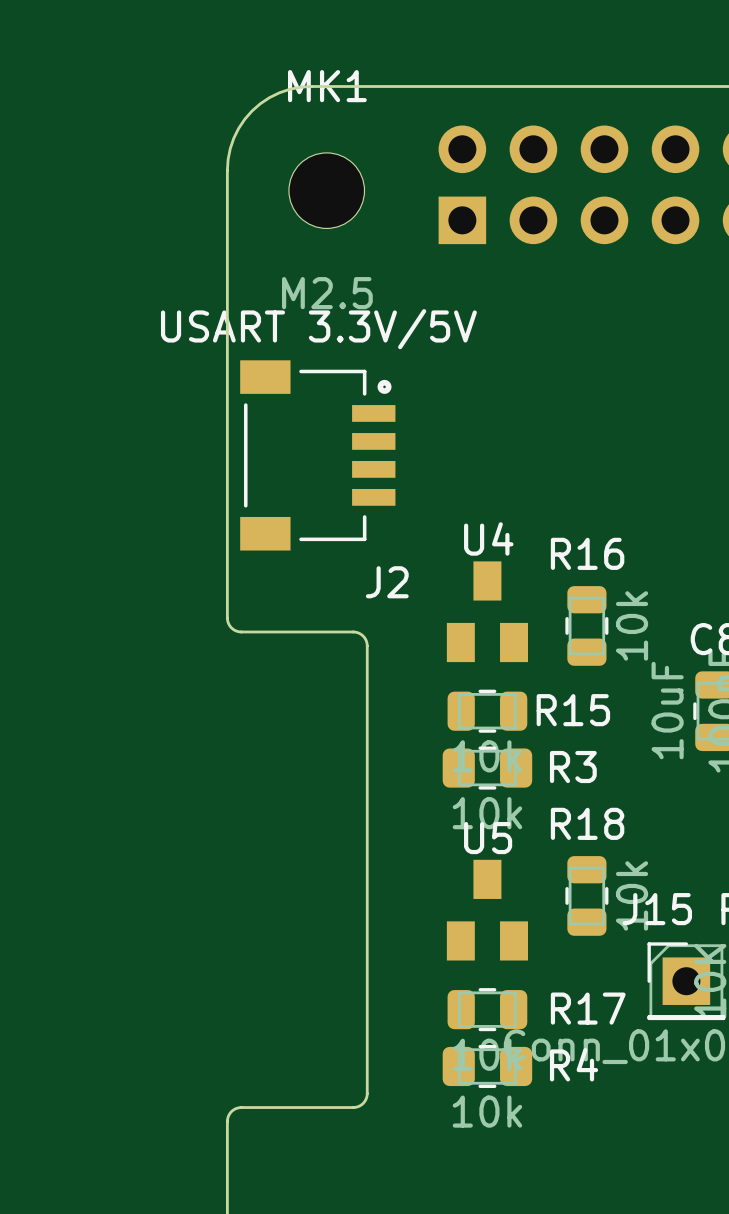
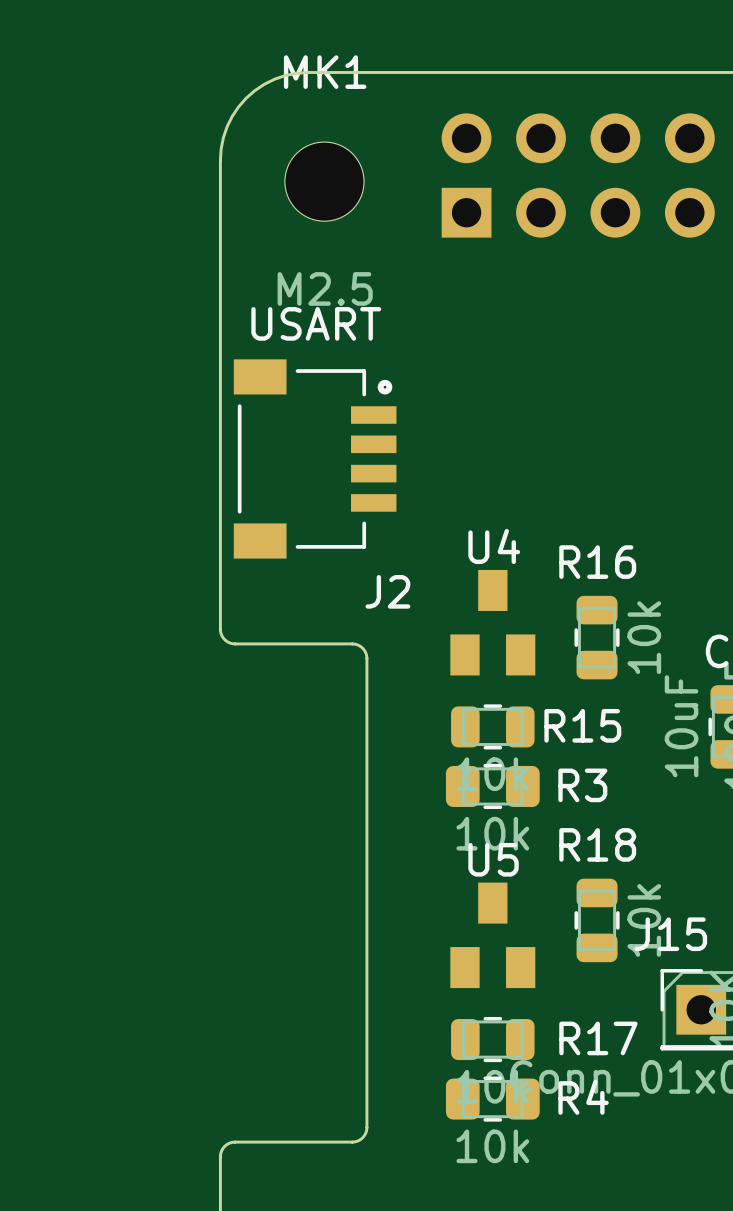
J2 value: USART 3.3V/5V (318, 329) -> USART (316, 323)

